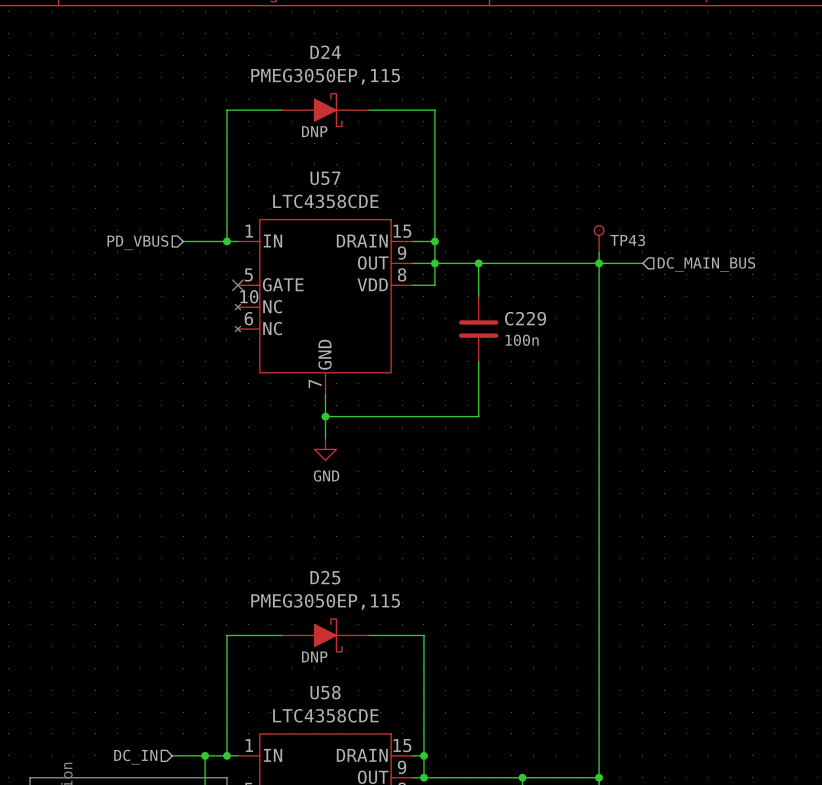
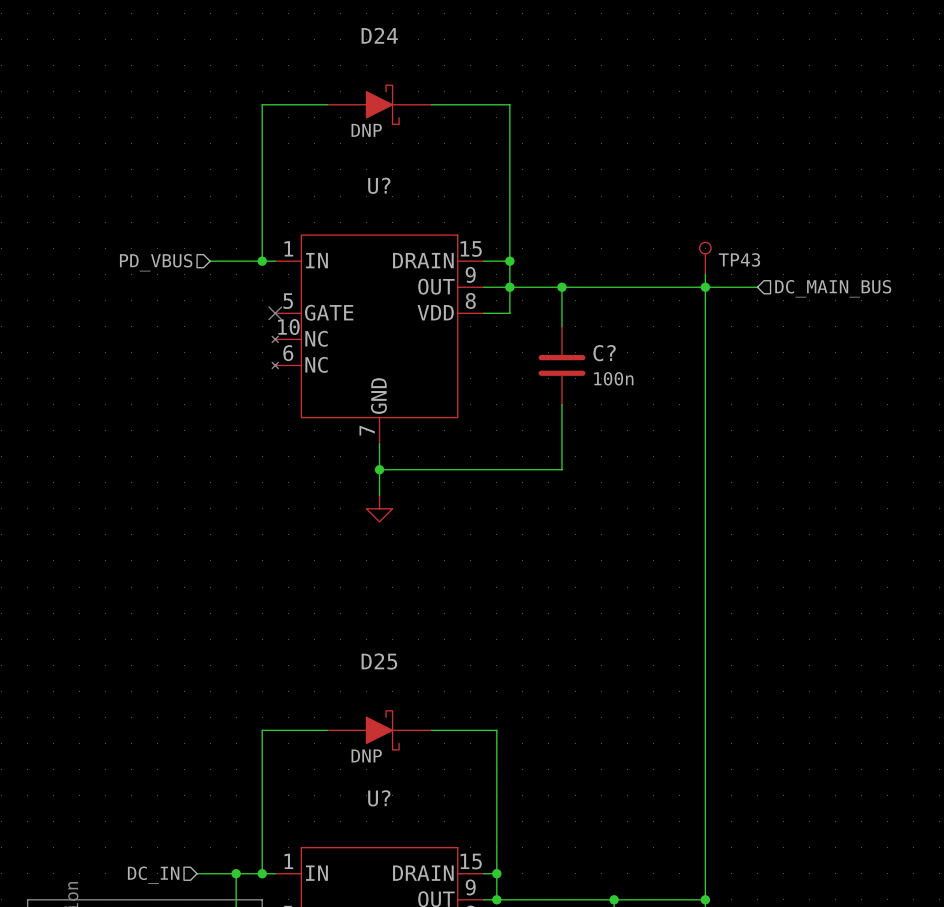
D24 value: PMEG3050EP,115 (325, 76) -> none
U57 name: U57 (325, 178) -> U? (379, 185)
U57 value: LTC4358CDE (325, 201) -> none
C229 name: C229 (525, 318) -> C? (604, 353)
power symbol text: GND (326, 475) -> none
D25 value: PMEG3050EP,115 (325, 601) -> none
U58 name: U58 (325, 692) -> U? (379, 798)
U58 value: LTC4358CDE (325, 715) -> none

